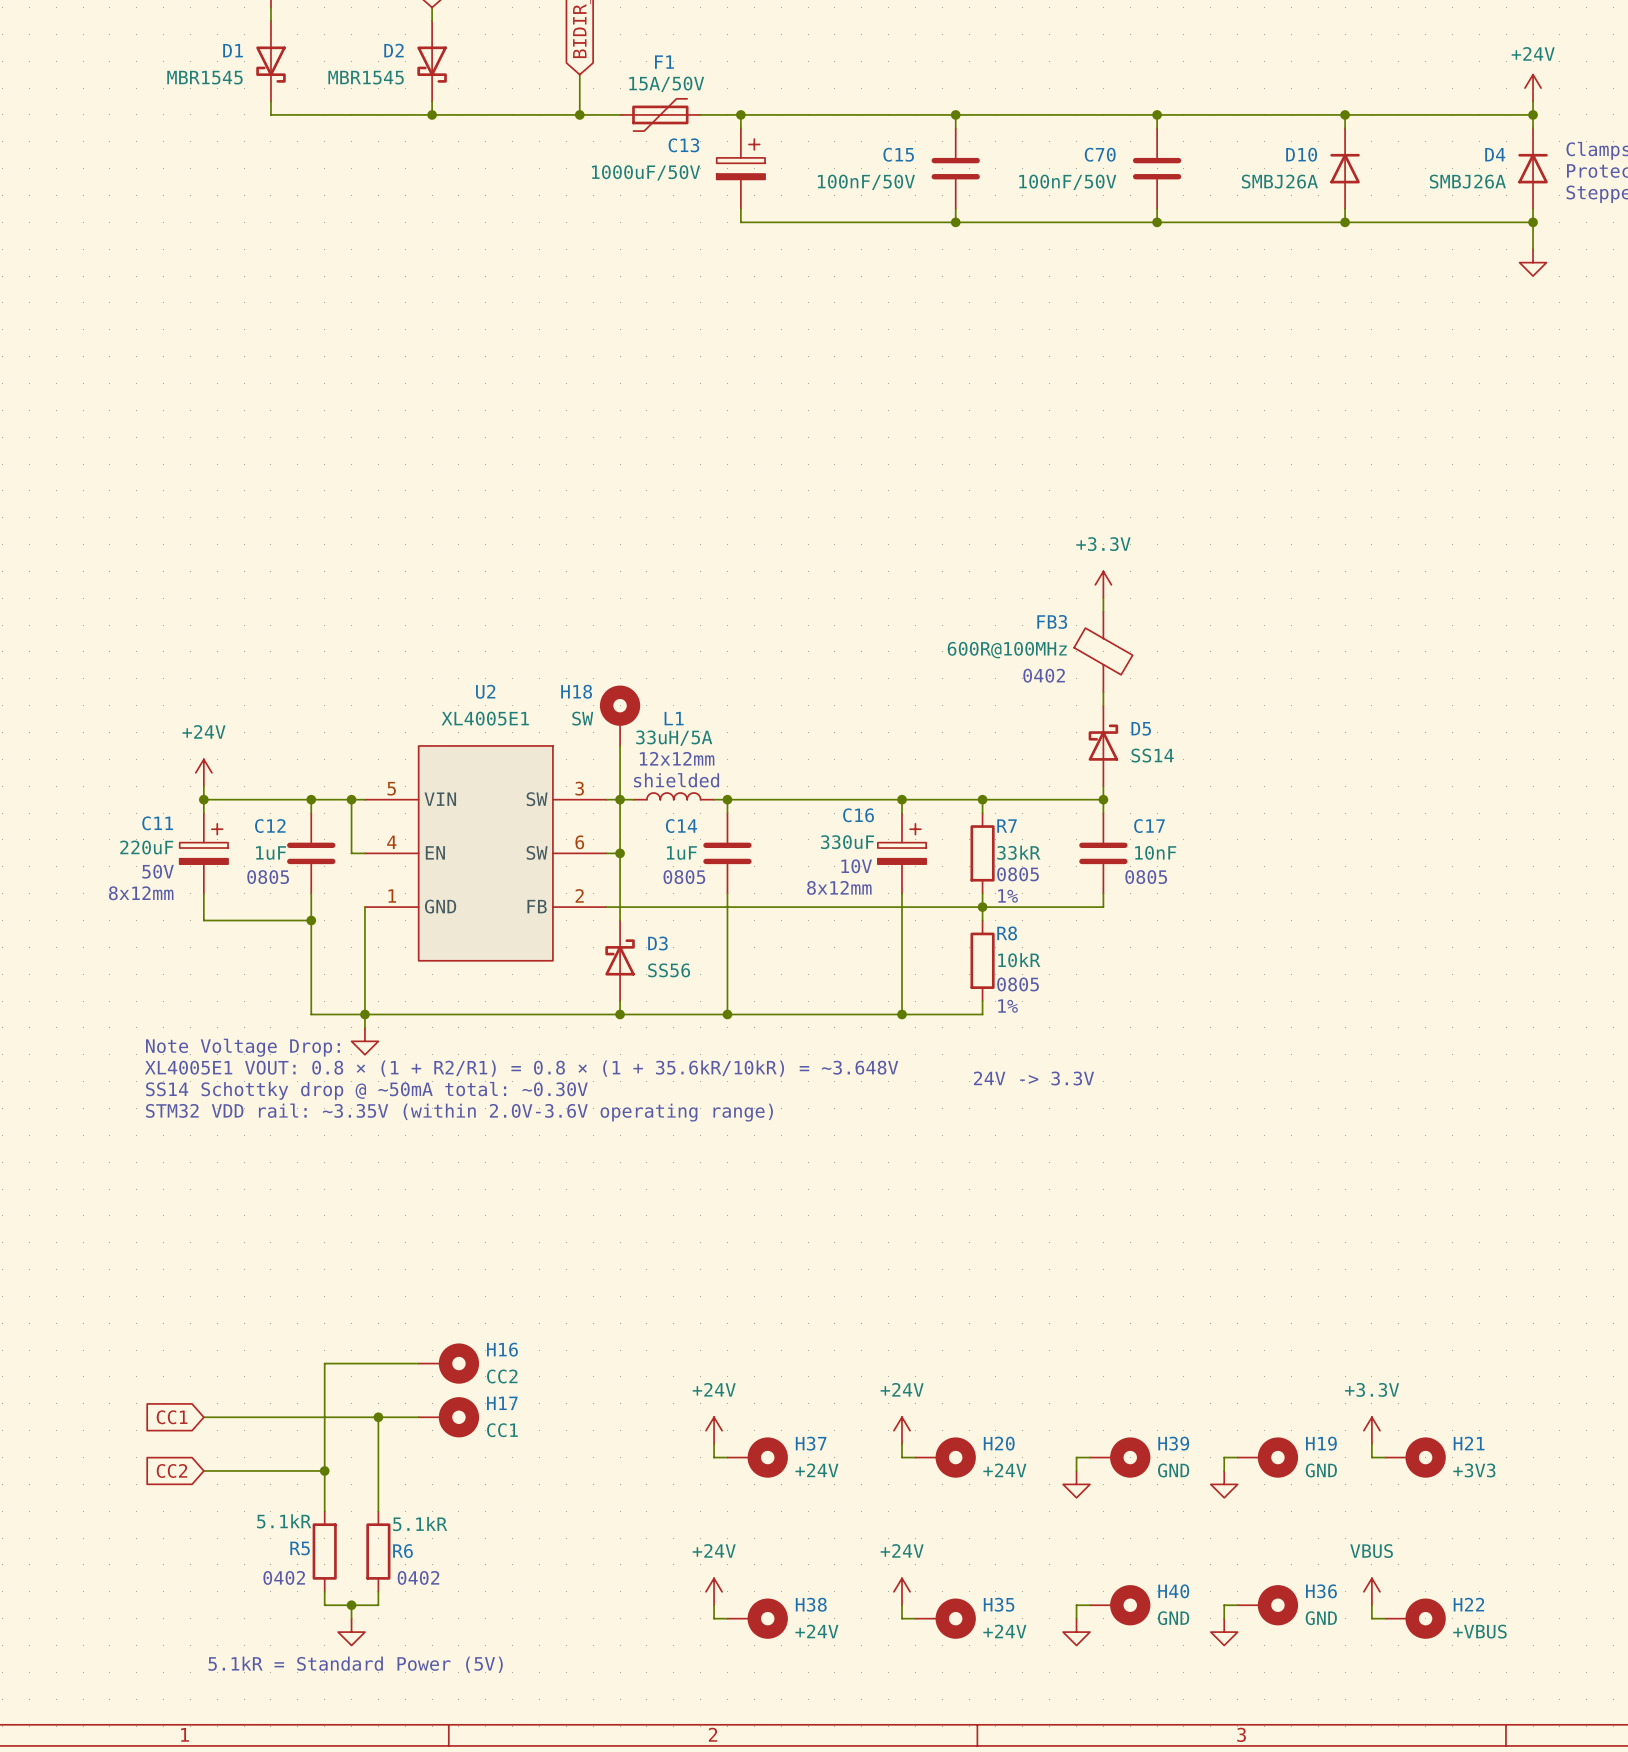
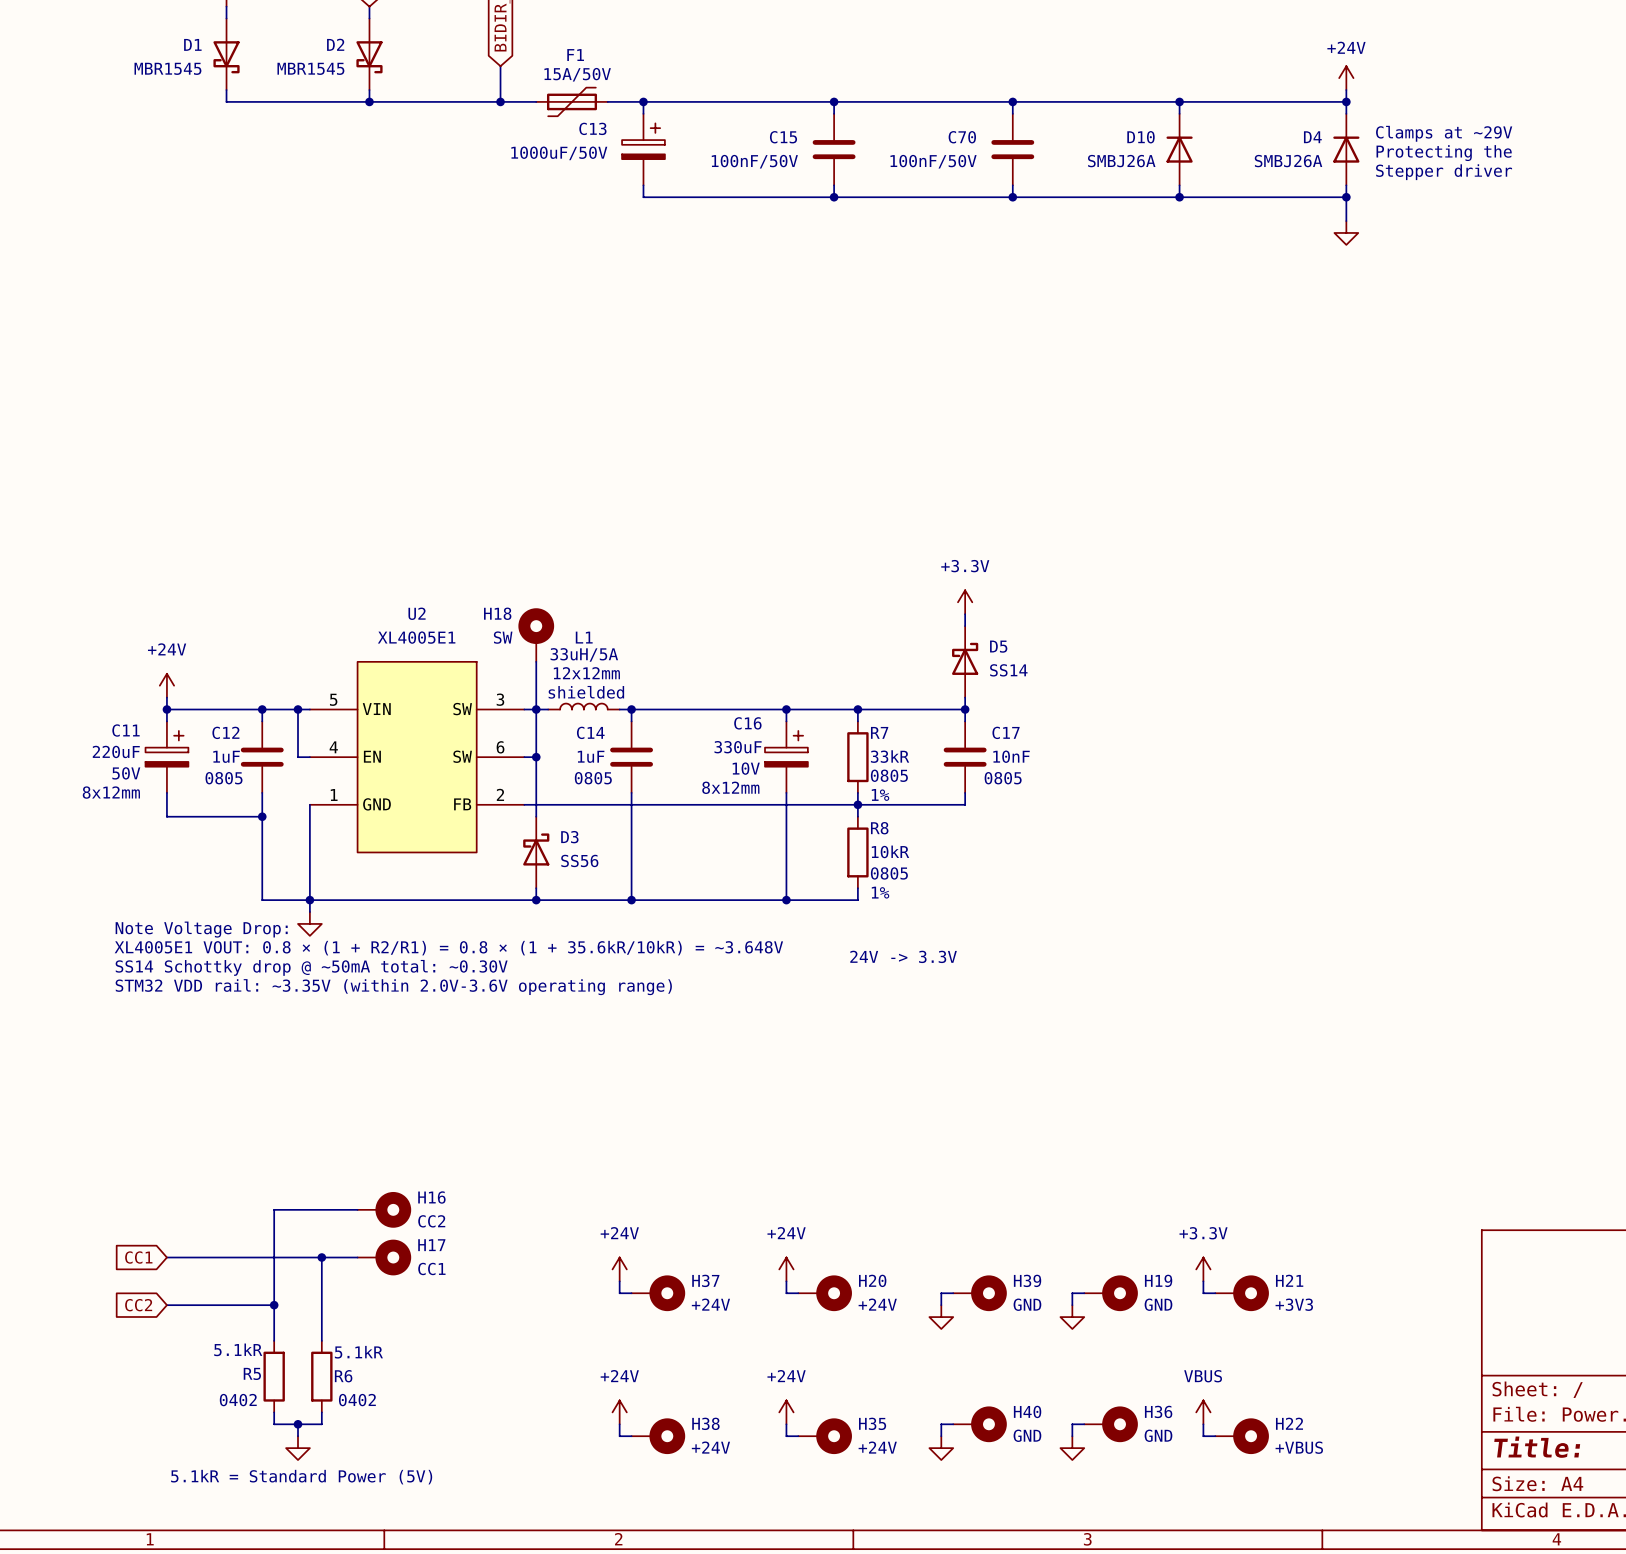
power symbol position: +3.3V (1103, 584) -> +3.3V (965, 602)
wire: (1103, 598) (1103, 611) -> none
FB3: 600R@100MHz (1103, 651) -> none
text: 0402 (1044, 675) -> none

